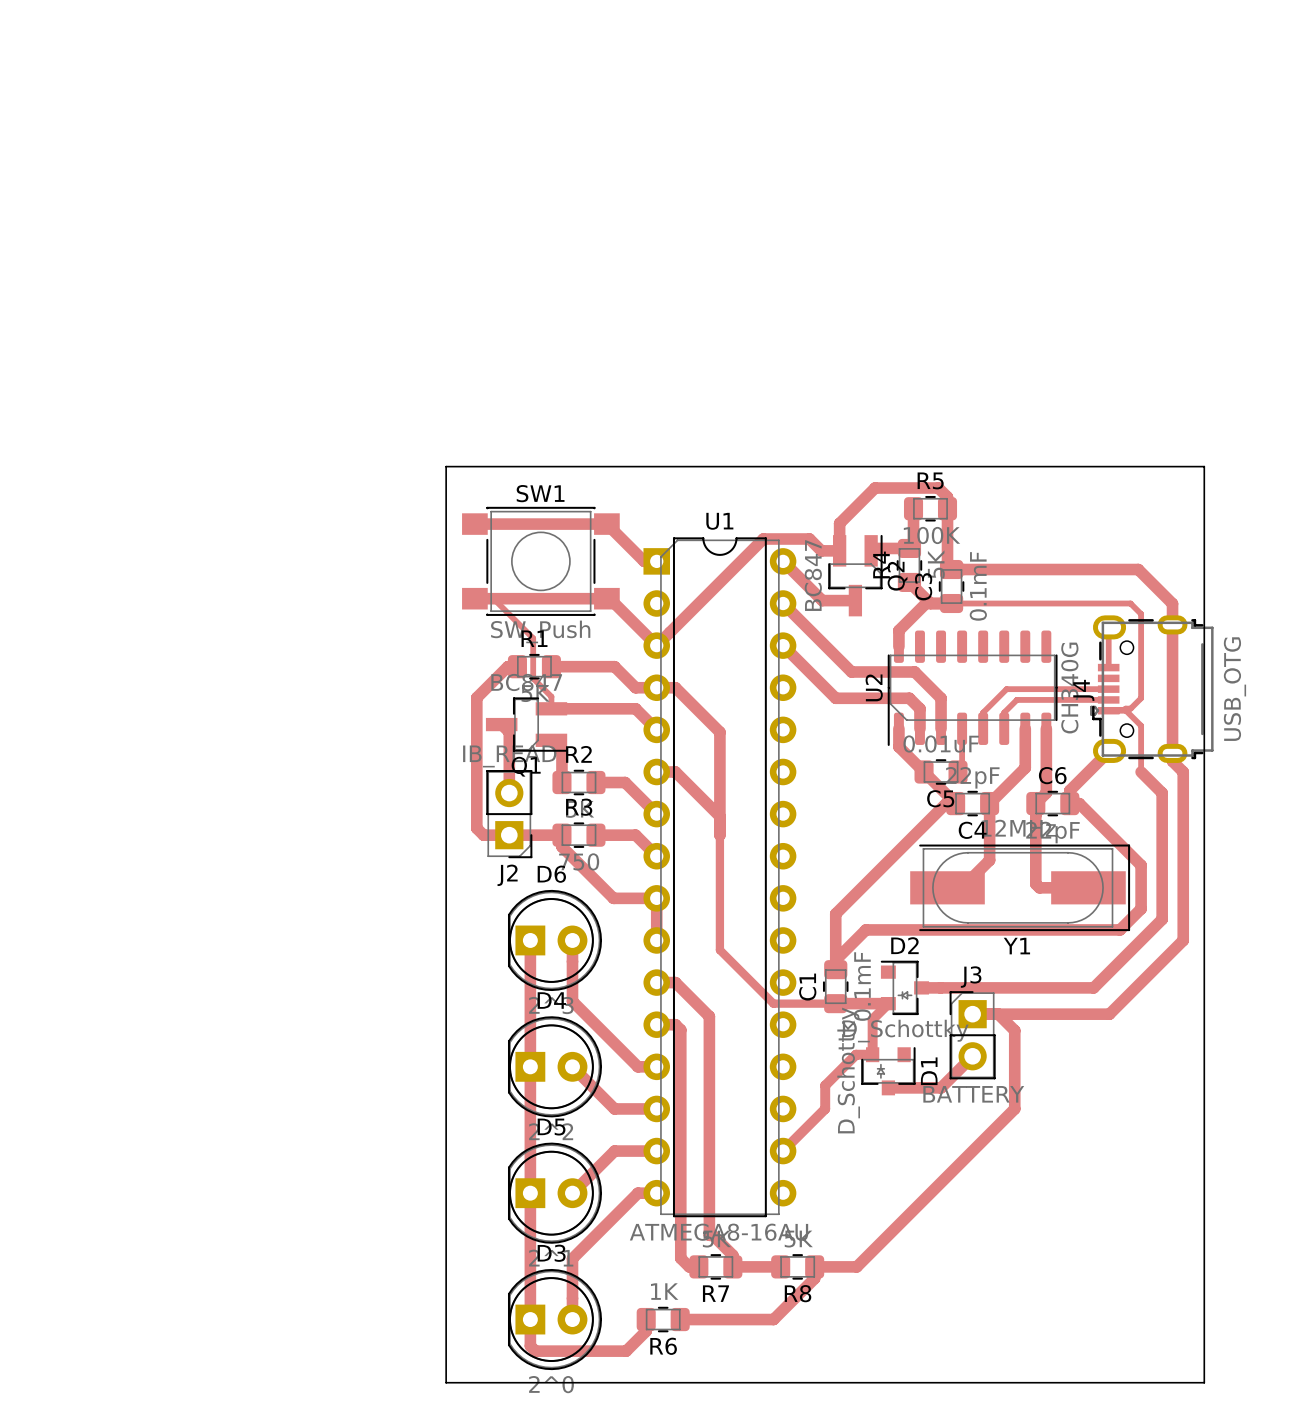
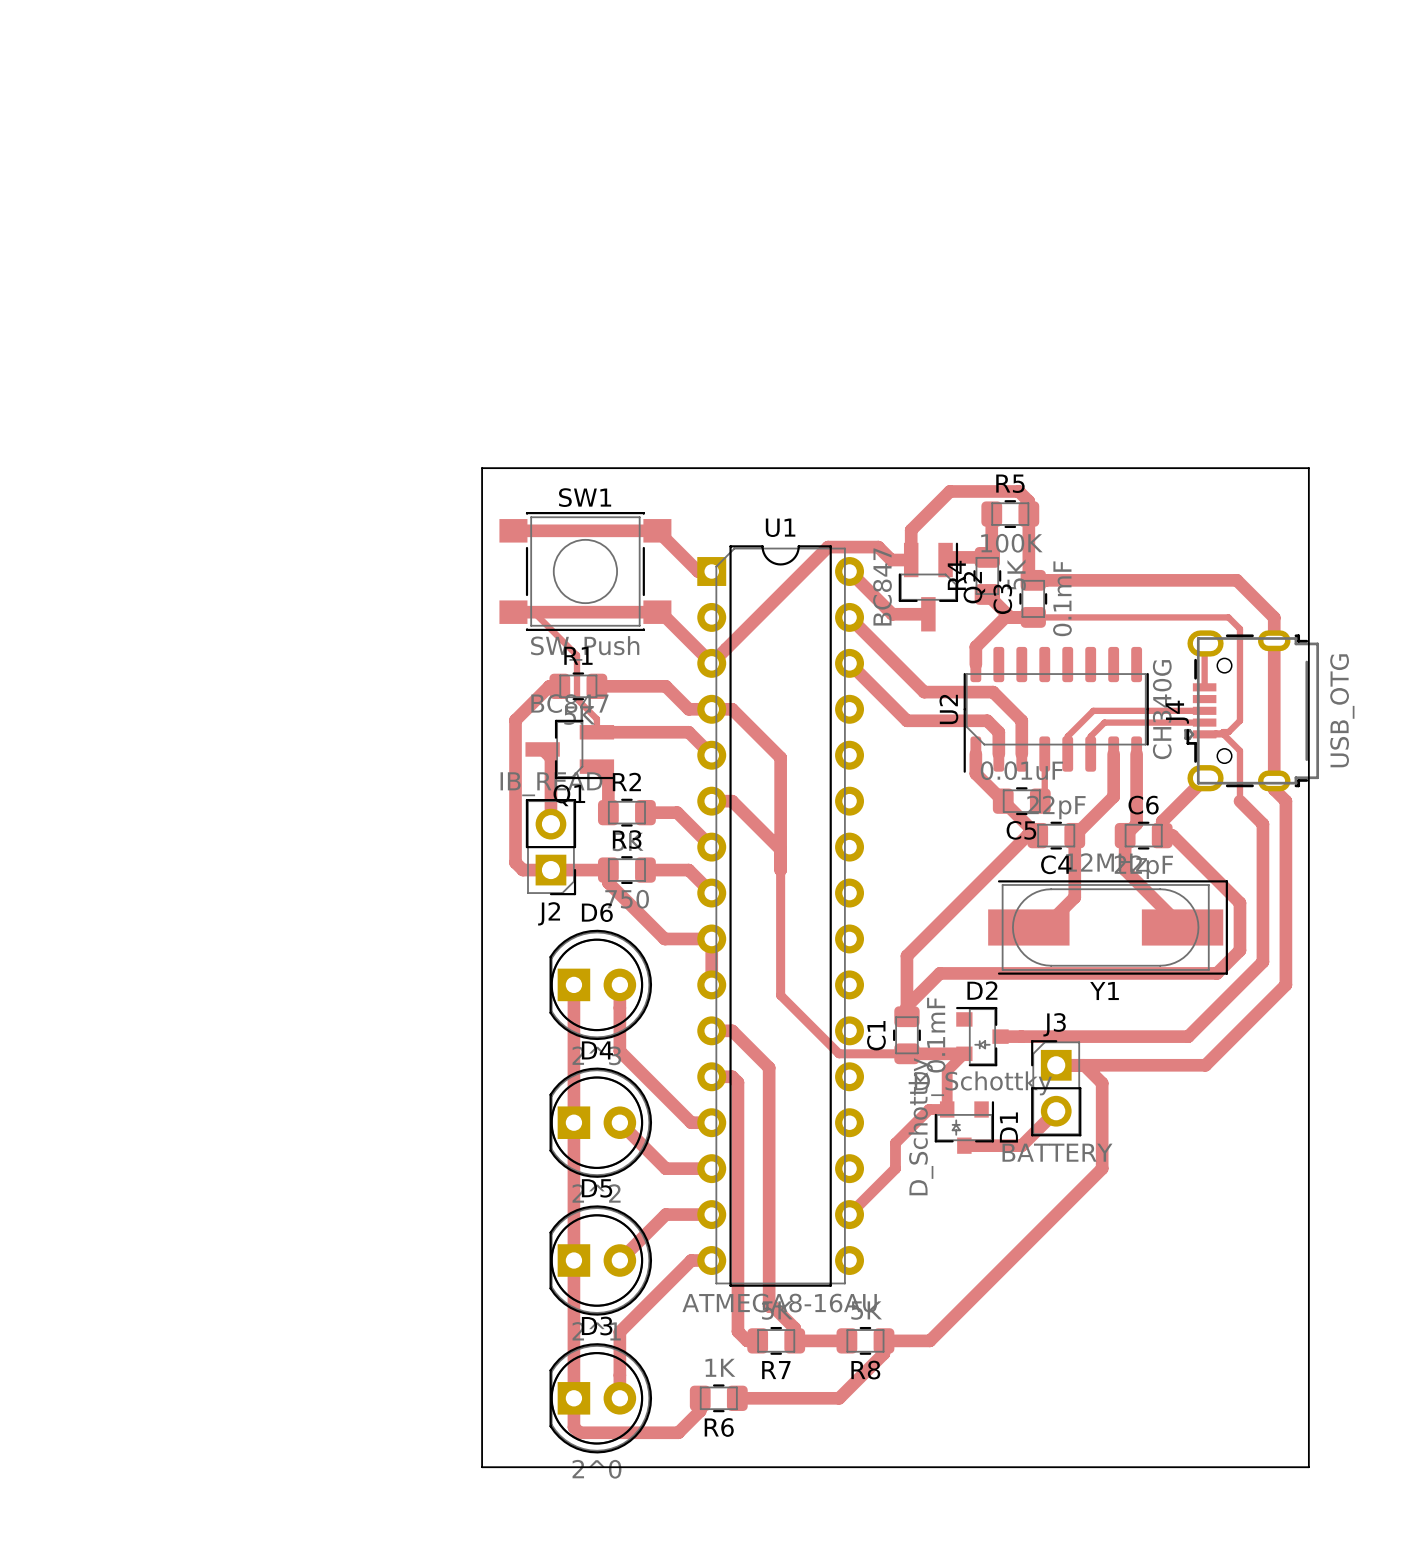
track: (1035, 835) (1035, 884) (1039, 887) (1088, 887) -> (1125, 870) (1182, 927)

